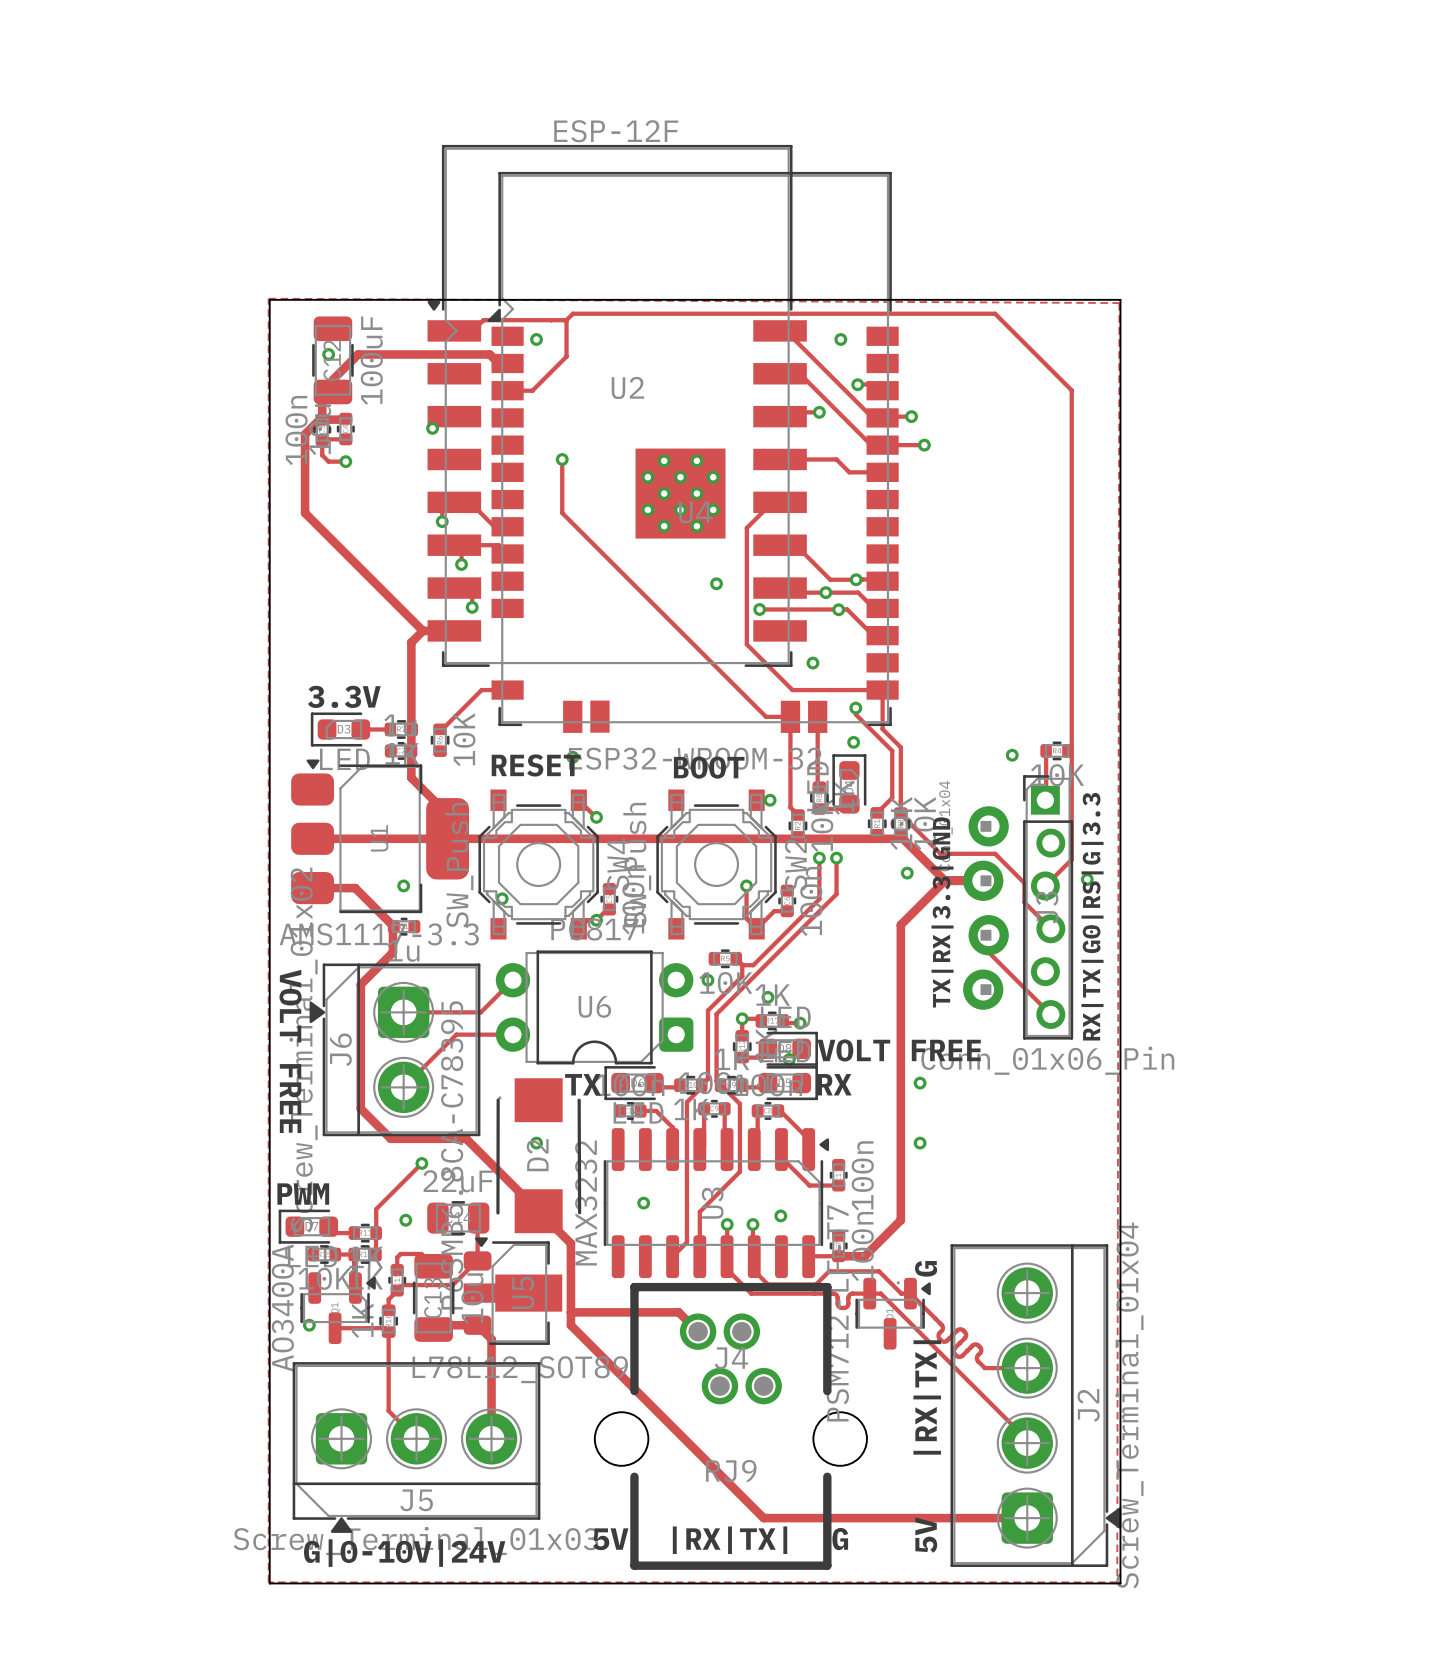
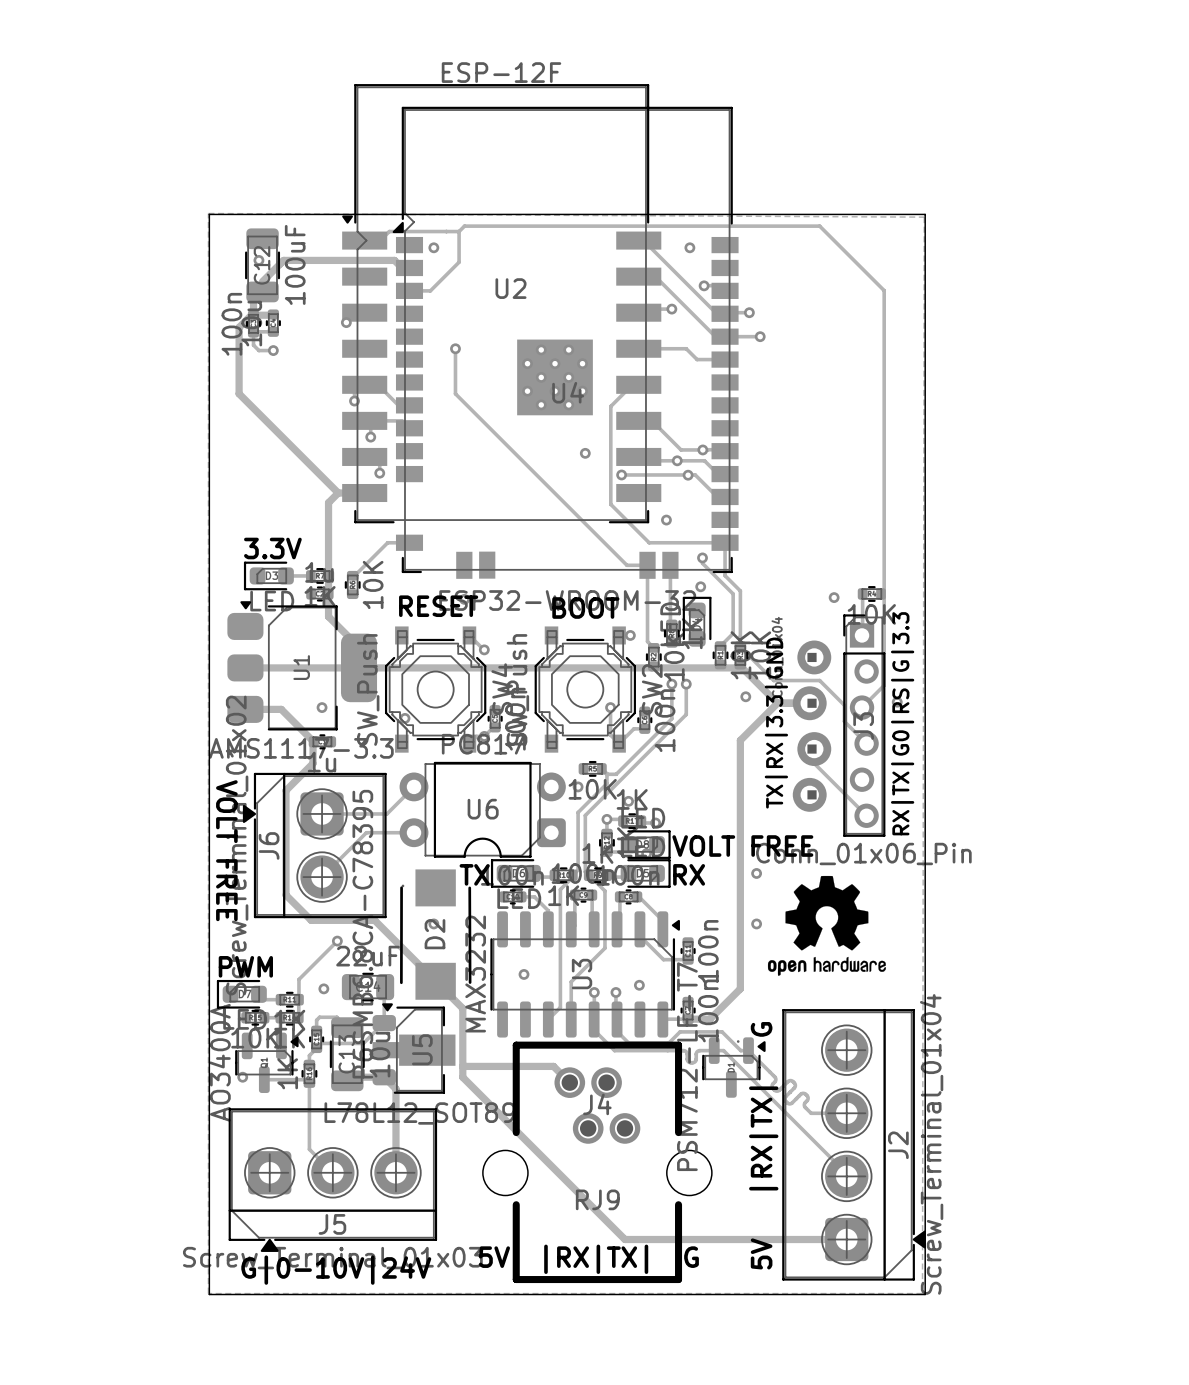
drawing: none -> [767, 875, 886, 976]

